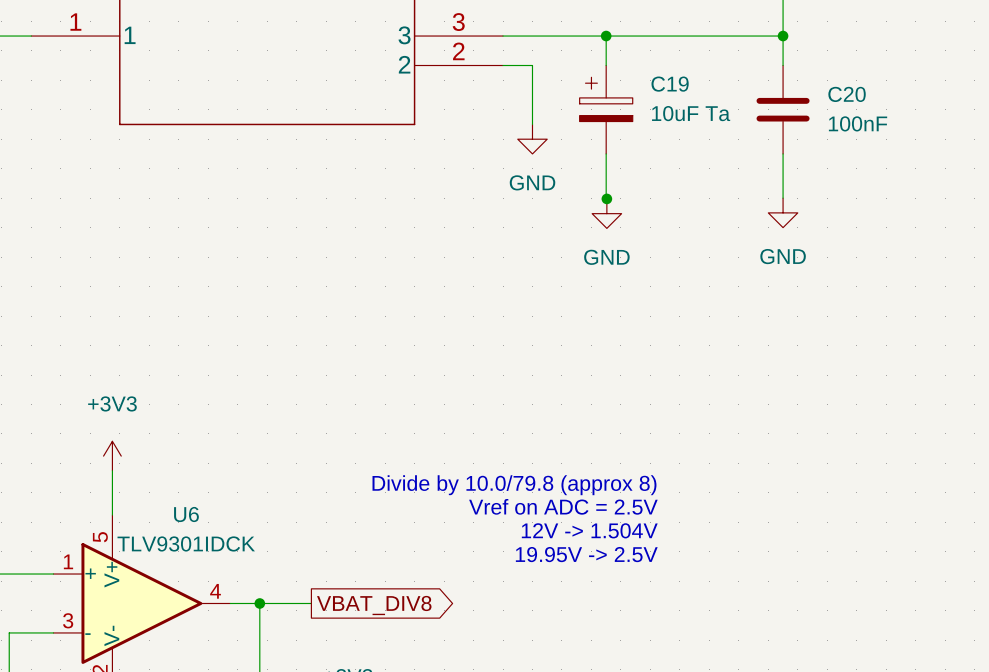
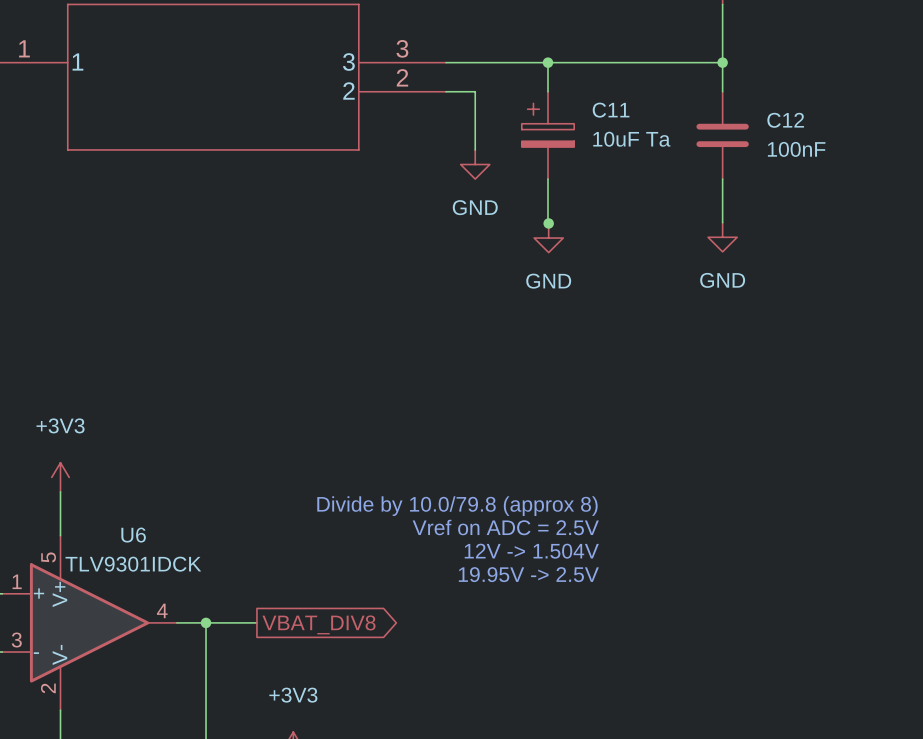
C19 name: C19 (670, 84) -> C11 (611, 110)
C20 name: C20 (847, 94) -> C12 (785, 120)

